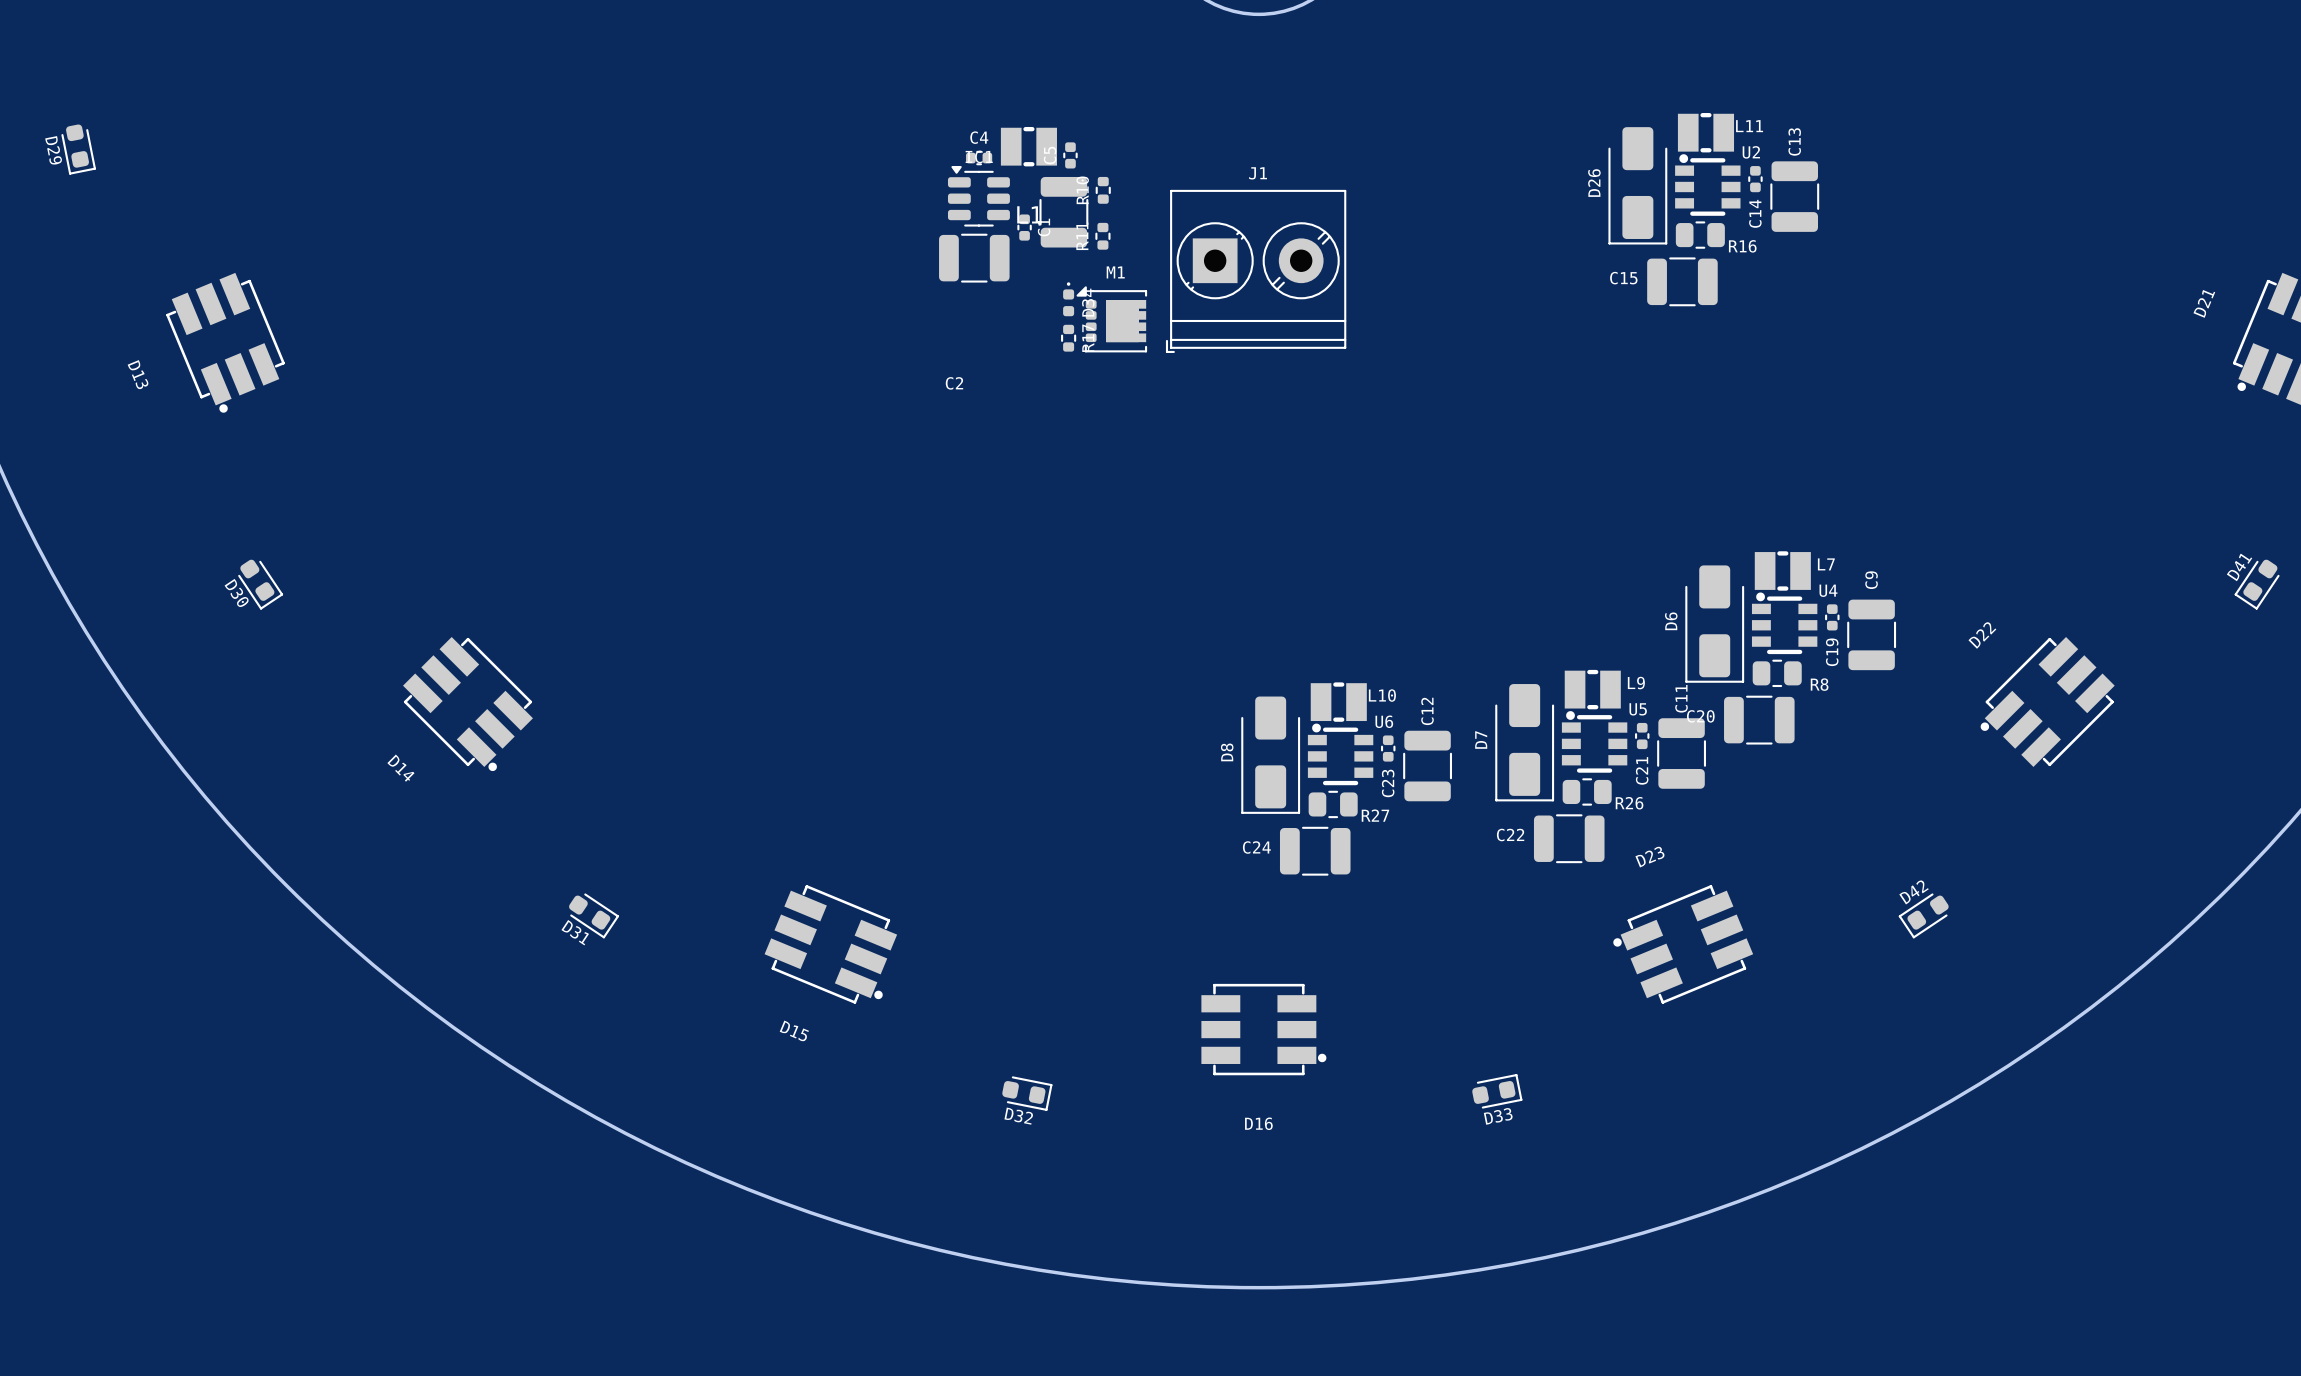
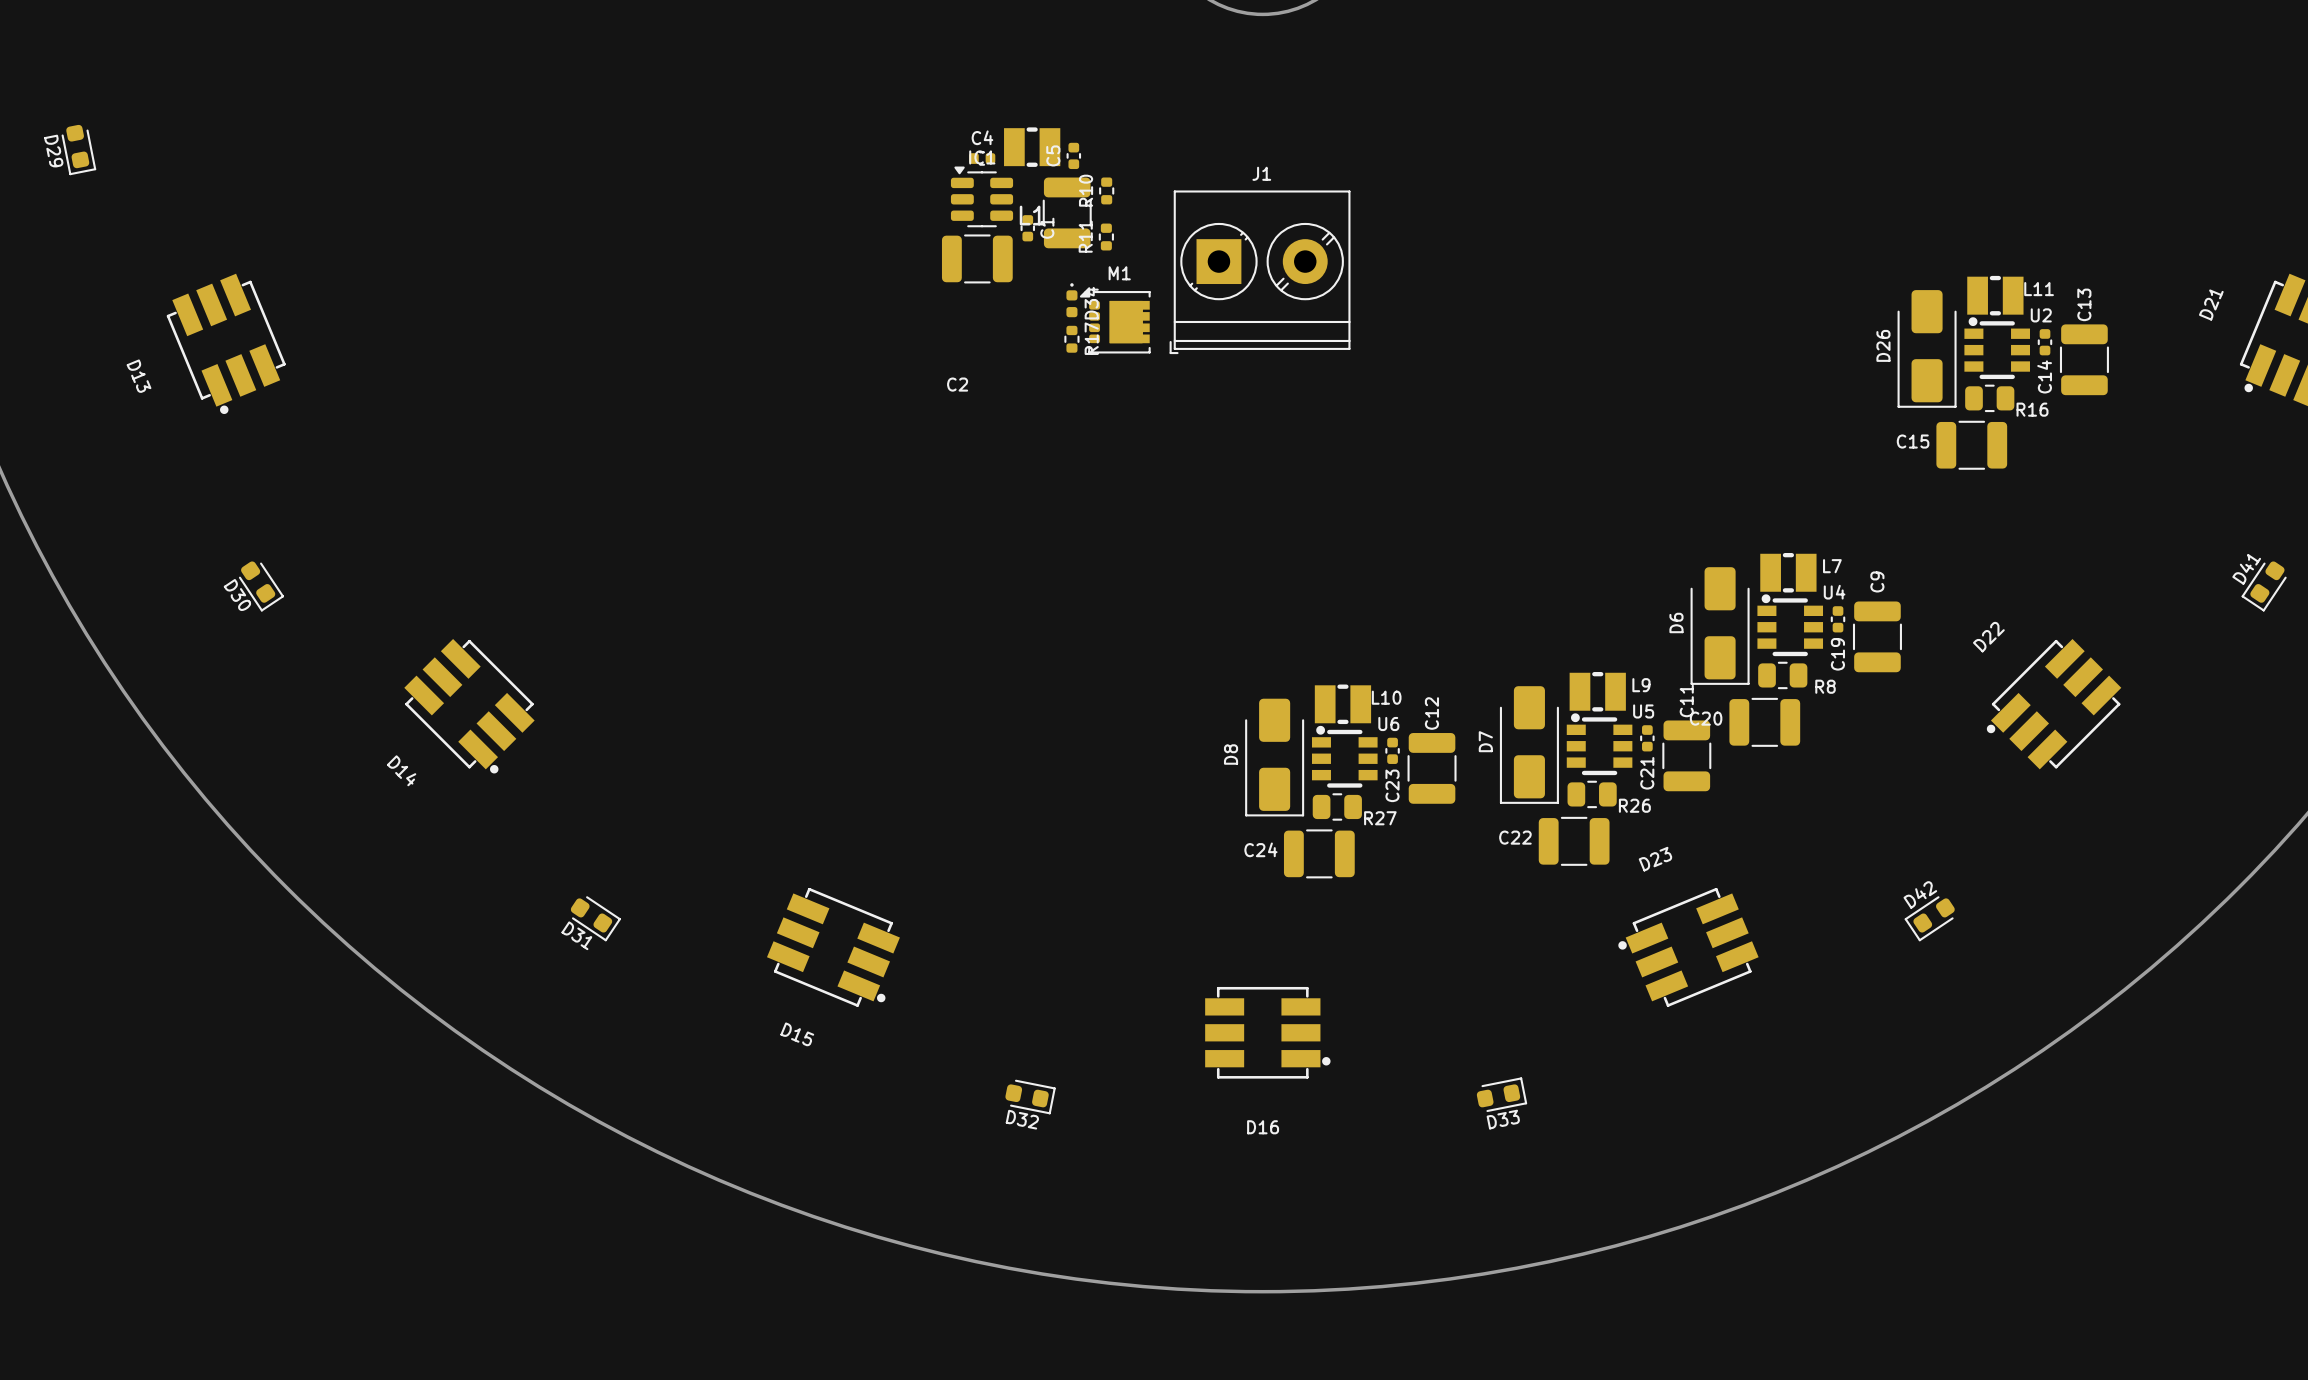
L11 position: (1705, 132) -> (1995, 295)
C14 position: (1755, 179) -> (2044, 342)
D26 position: (1637, 185) -> (1927, 348)
U2 position: (1707, 185) -> (1997, 348)
C13 position: (1794, 196) -> (2084, 359)
R16 position: (1700, 235) -> (1989, 398)
C15 position: (1682, 281) -> (1971, 445)

